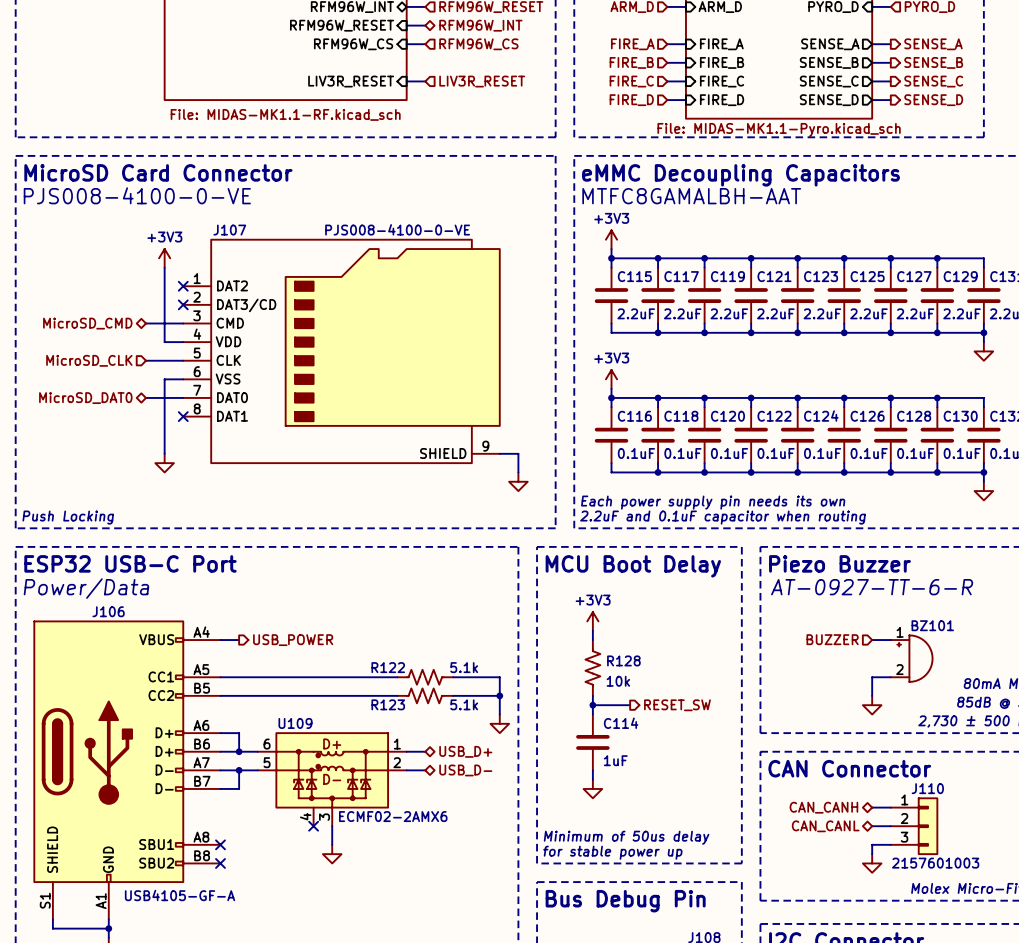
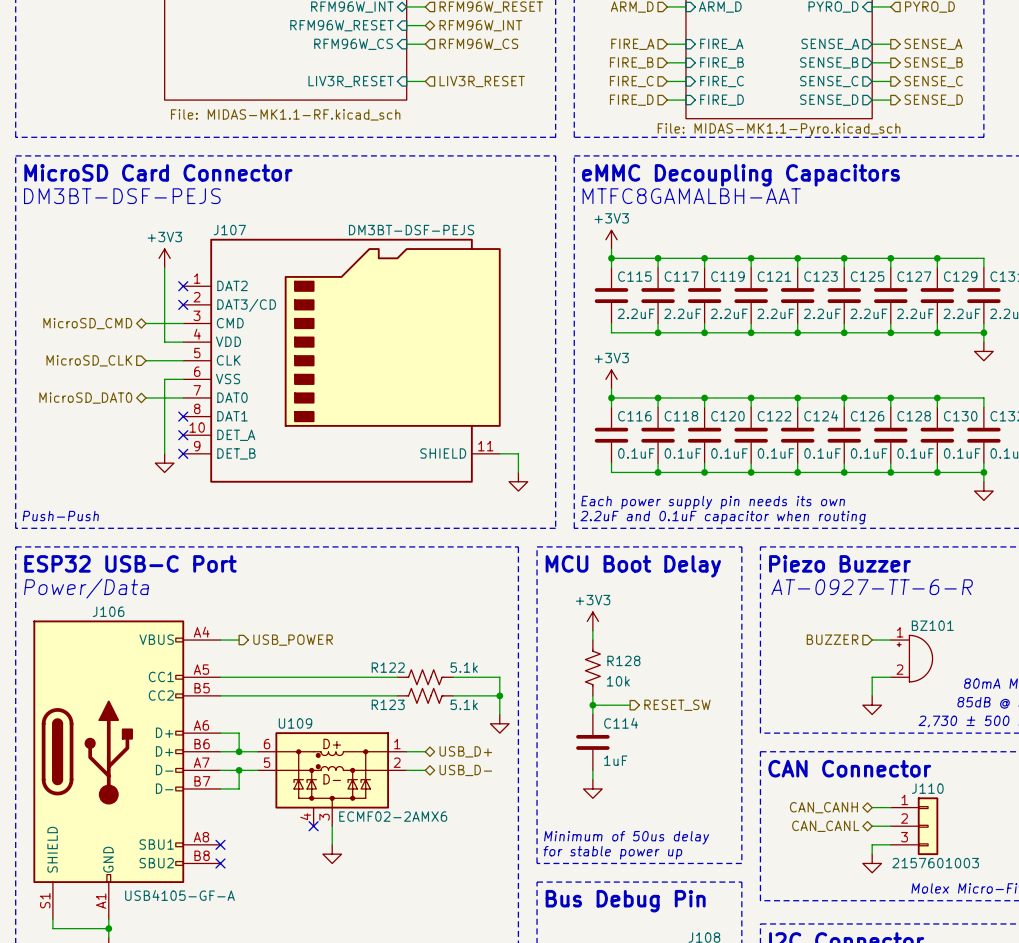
text: PJS008-4100-0-VE (137, 195) -> DM3BT-DSF-PEJS (122, 196)
J107 value: PJS008-4100-0-VE (397, 229) -> DM3BT-DSF-PEJS (411, 230)
J107 symbol: [183, 238, 501, 465] -> [183, 238, 501, 483]
no-connect mark: none -> (183, 435)
no-connect mark: none -> (183, 453)
text: Push Locking (68, 517) -> Push-Push (60, 516)

